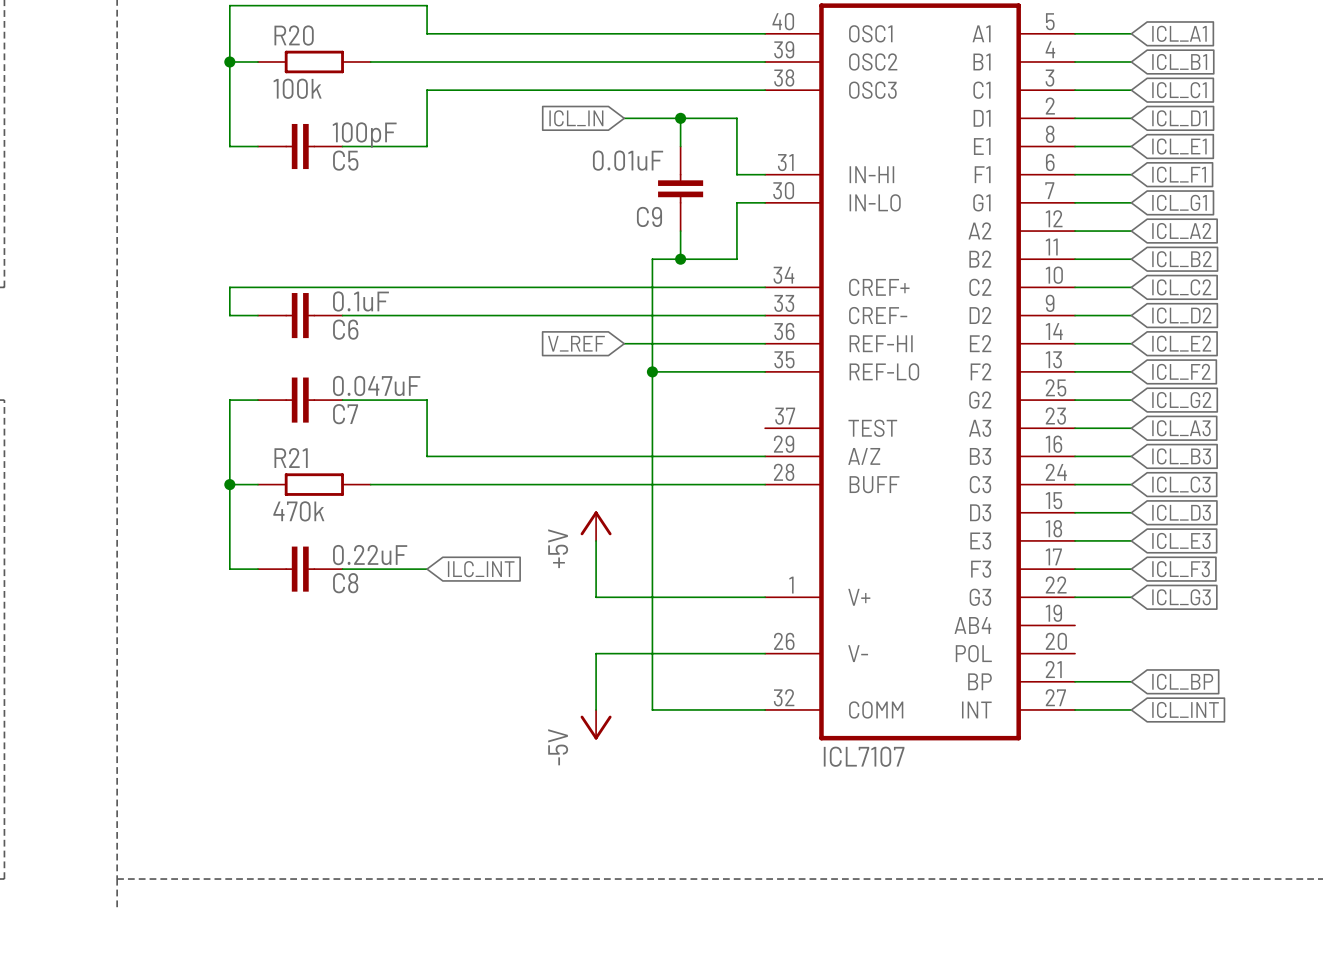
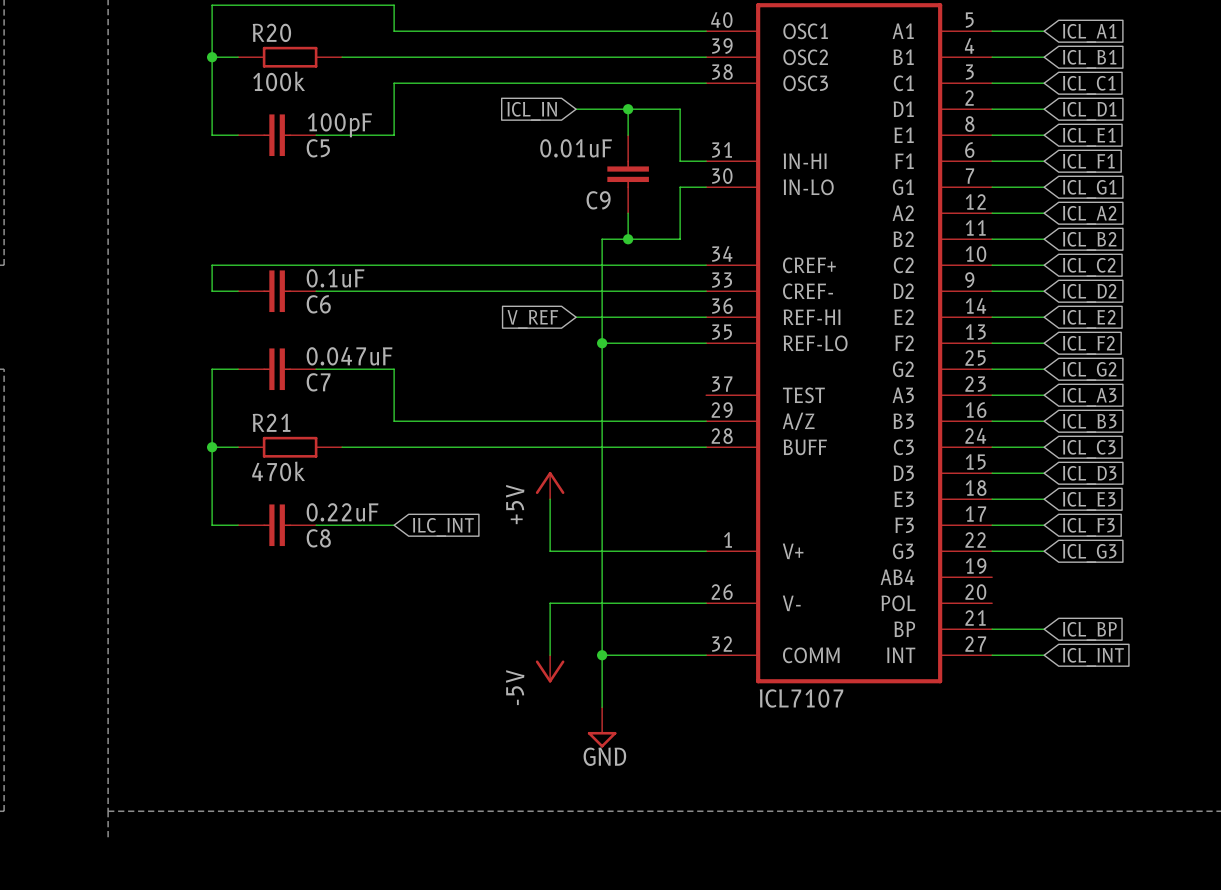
wire: none -> (602, 655) (602, 707)
junction: none -> (602, 655)
power symbol: none -> GND (602, 727)

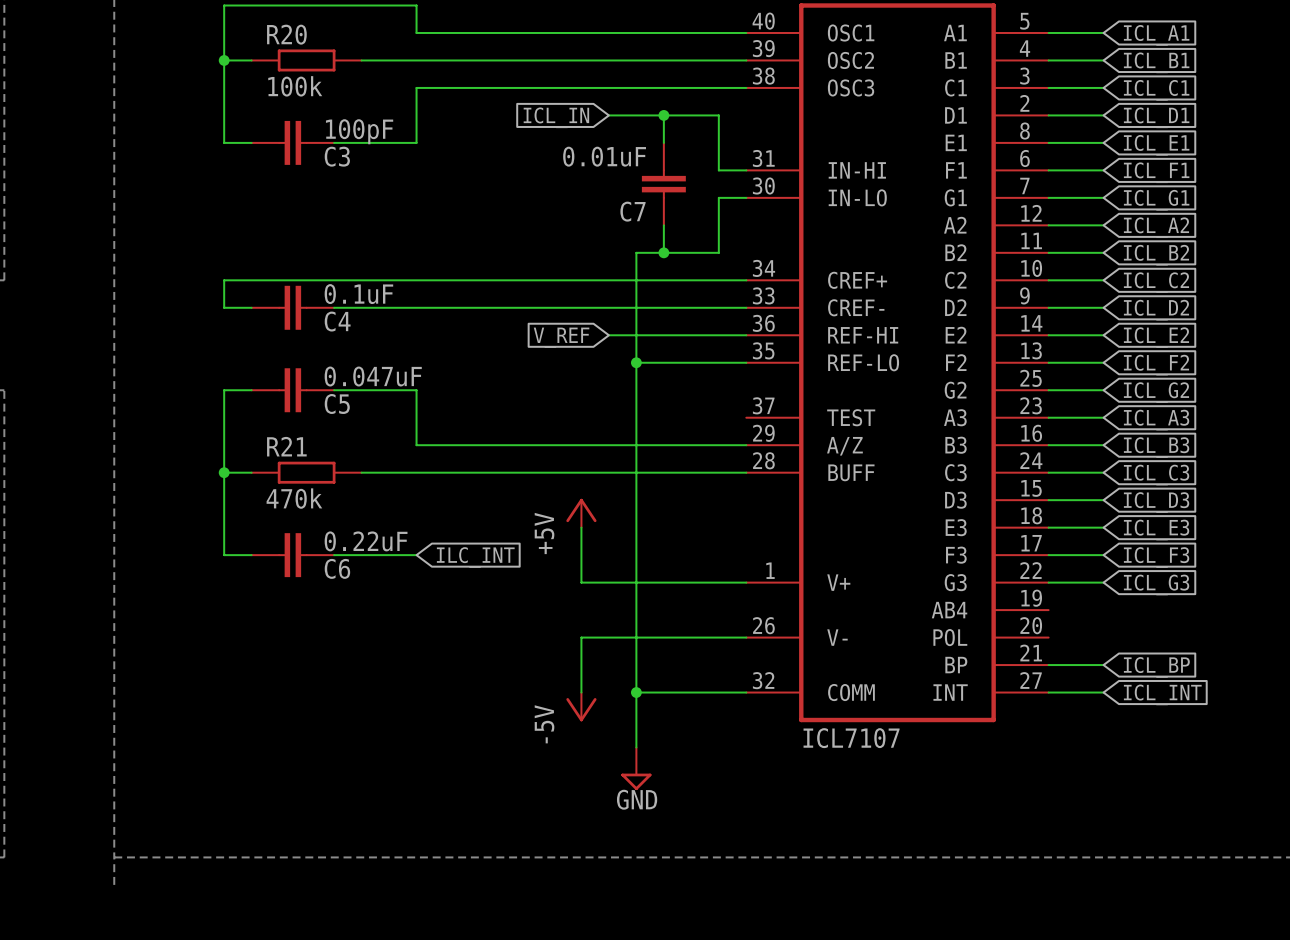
C5 name: C5 (318, 148) -> C3 (337, 156)
C9 name: C9 (598, 200) -> C7 (633, 211)
C6 name: C6 (318, 304) -> C4 (337, 321)
C7 name: C7 (318, 382) -> C5 (337, 403)
C8 name: C8 (318, 538) -> C6 (337, 568)

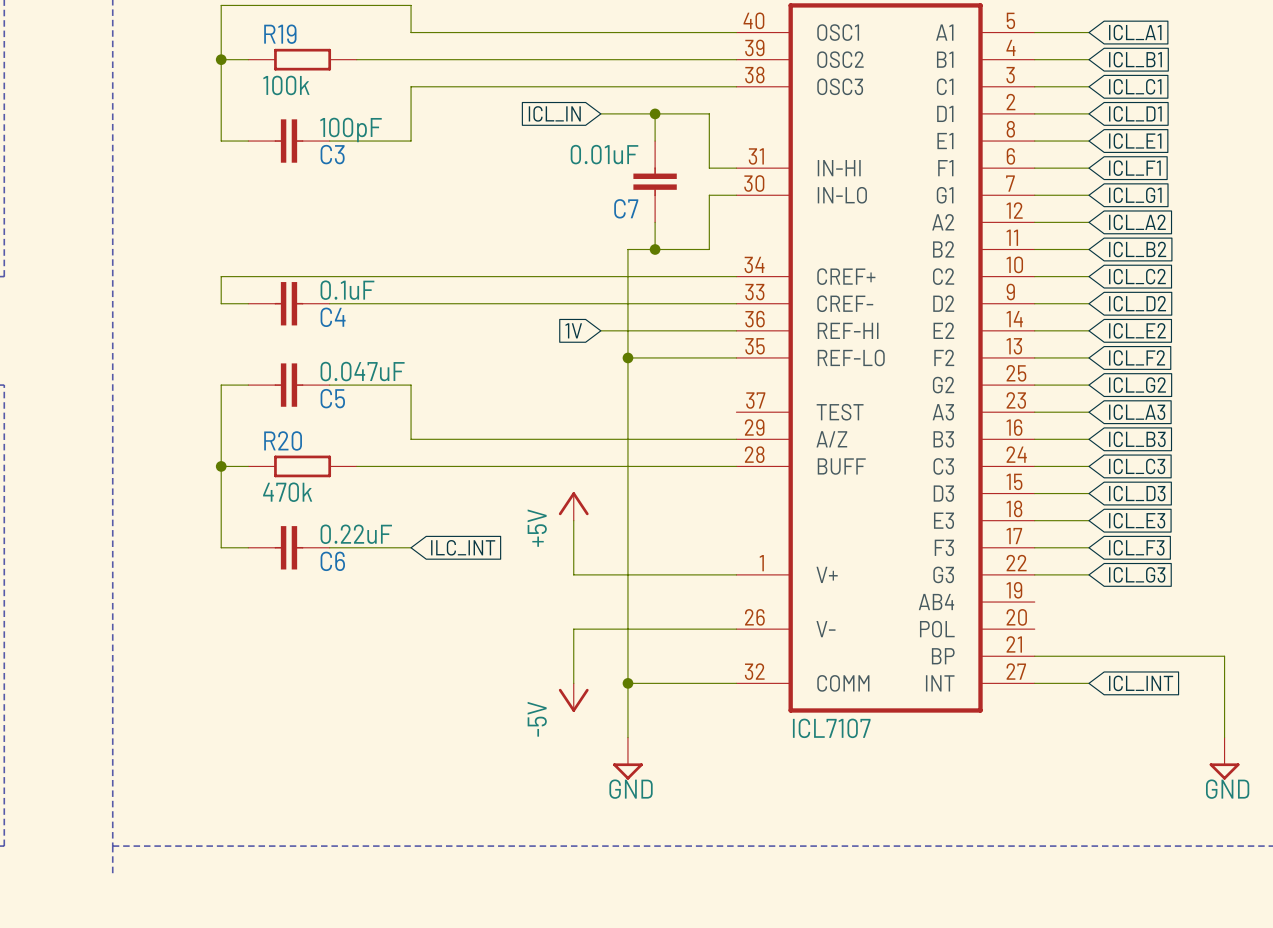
R20 name: R20 (286, 34) -> R19 (280, 34)
global label: V_REF (561, 337) -> 1V (573, 330)
R21 name: R21 (286, 446) -> R20 (283, 440)
wire: none -> (1088, 656) (1224, 656) (1224, 737)
global label: ICL_BP (1156, 667) -> none
power symbol: none -> GND (1224, 758)

